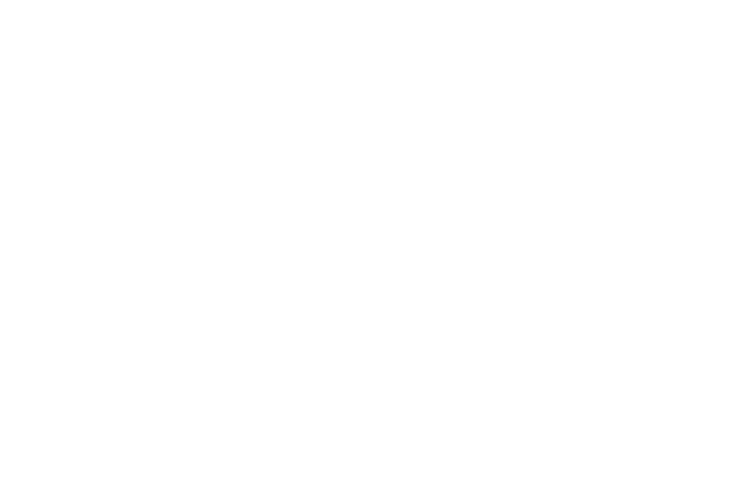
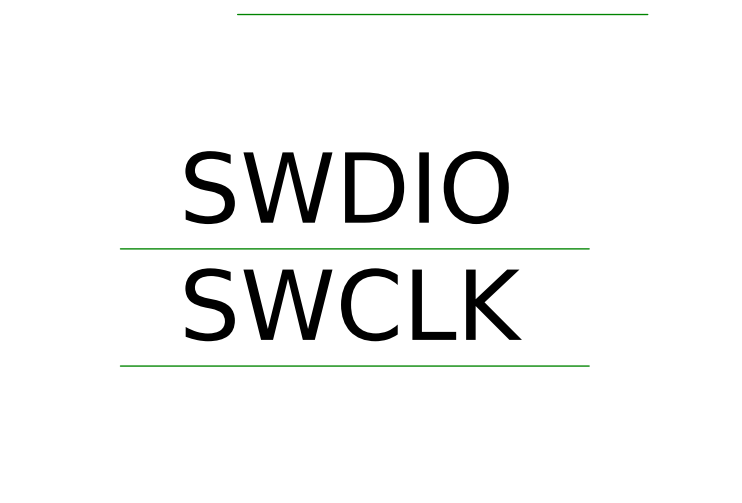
wire: none -> (237, 14) (647, 14)
label: none -> SWDIO (347, 187)
wire: none -> (120, 248) (589, 248)
label: none -> SWCLK (353, 304)
wire: none -> (120, 366) (589, 366)

